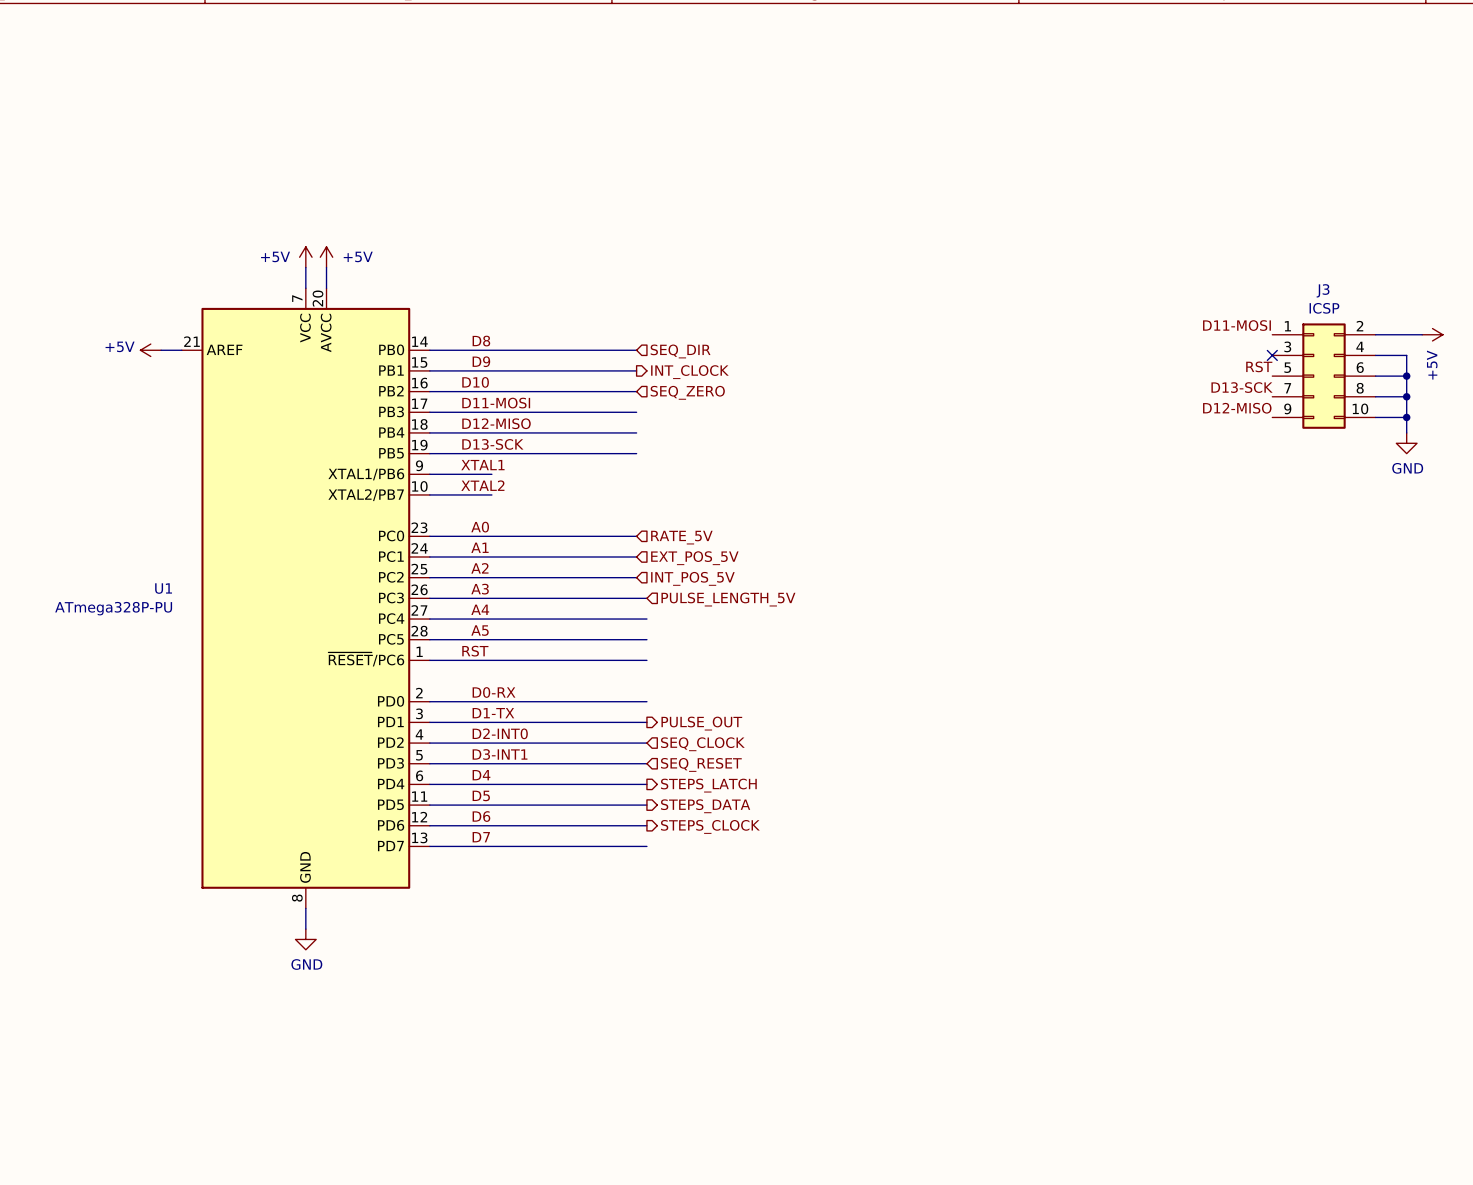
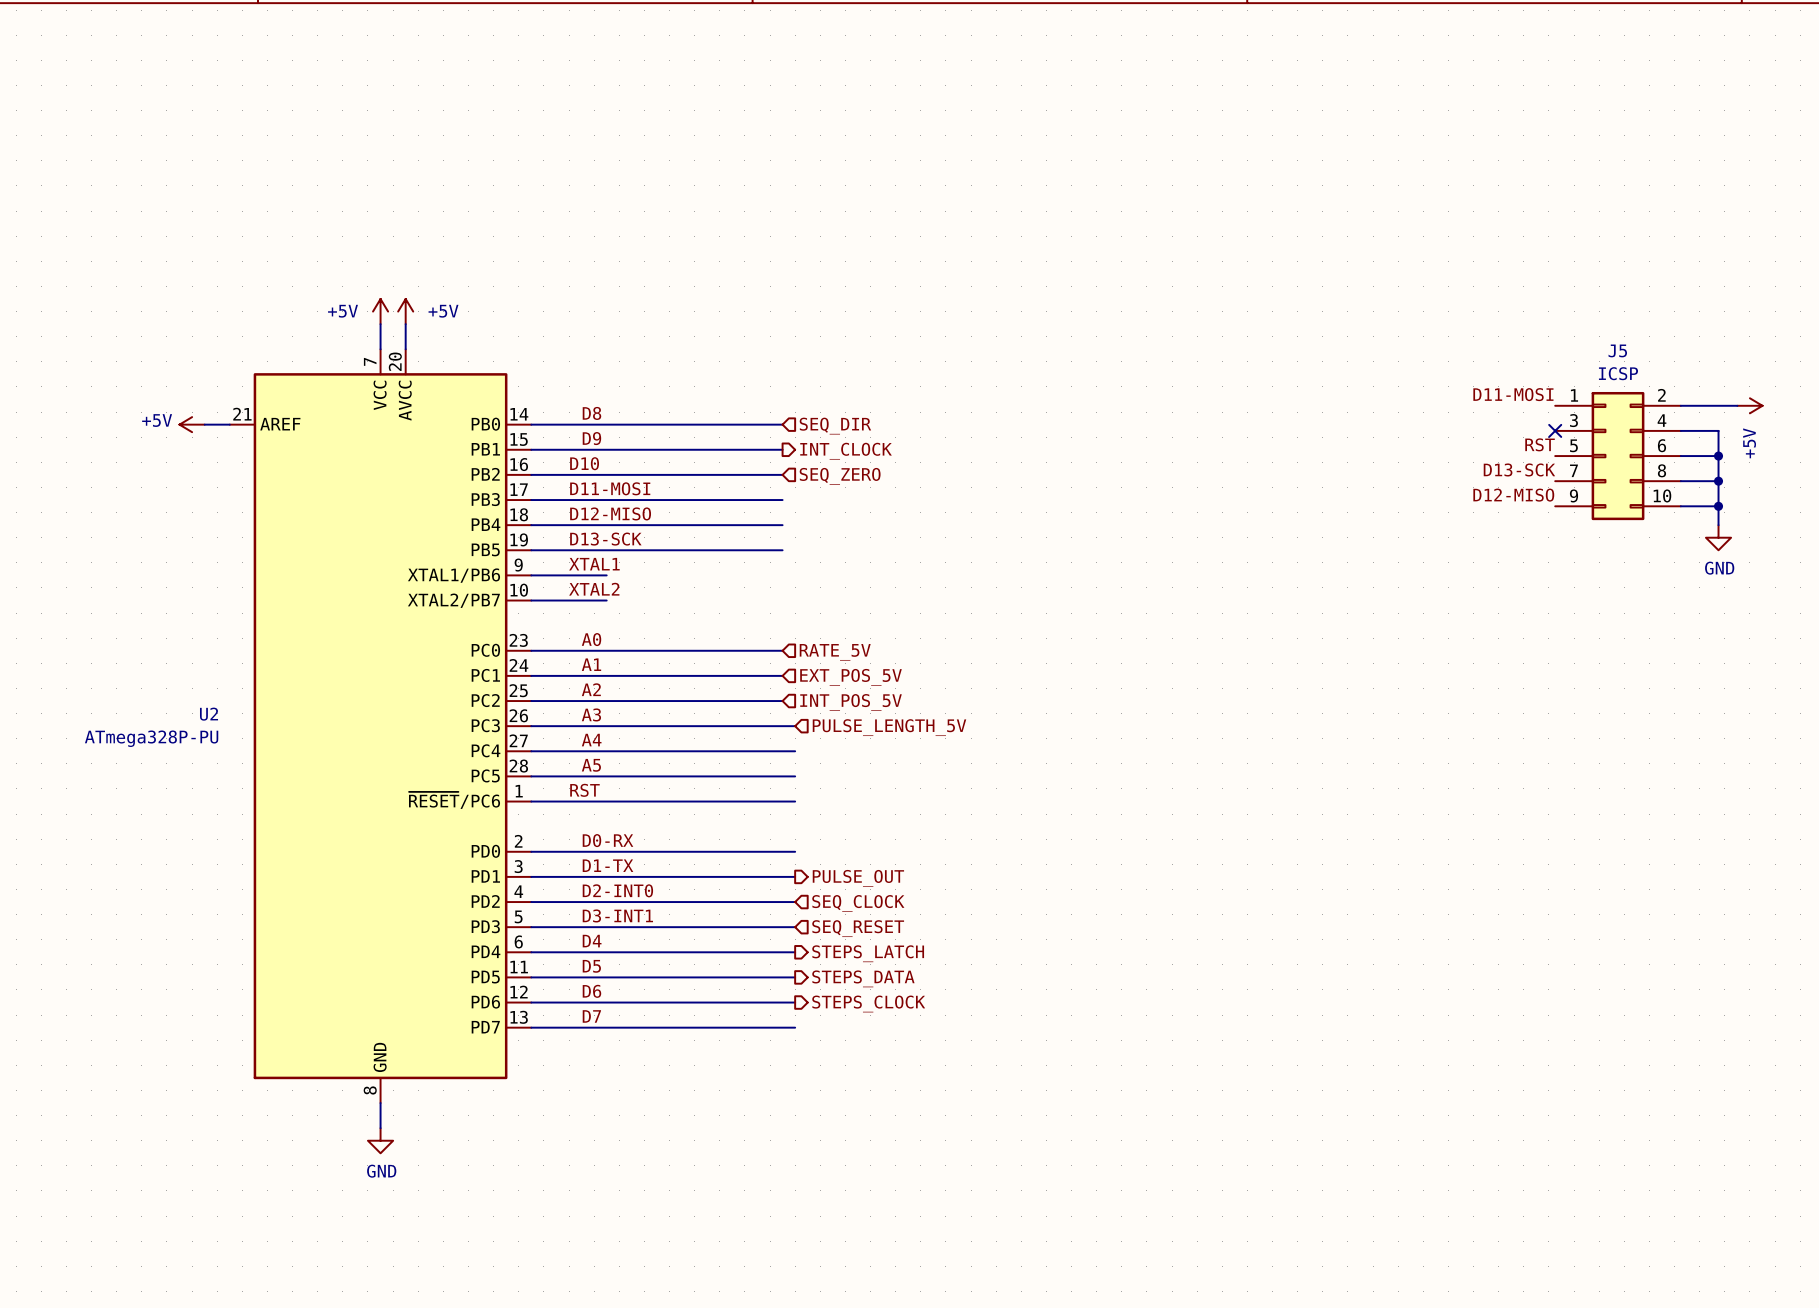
J3 name: J3 (1323, 290) -> J5 (1617, 350)
U1 name: U1 (163, 588) -> U2 (209, 714)

